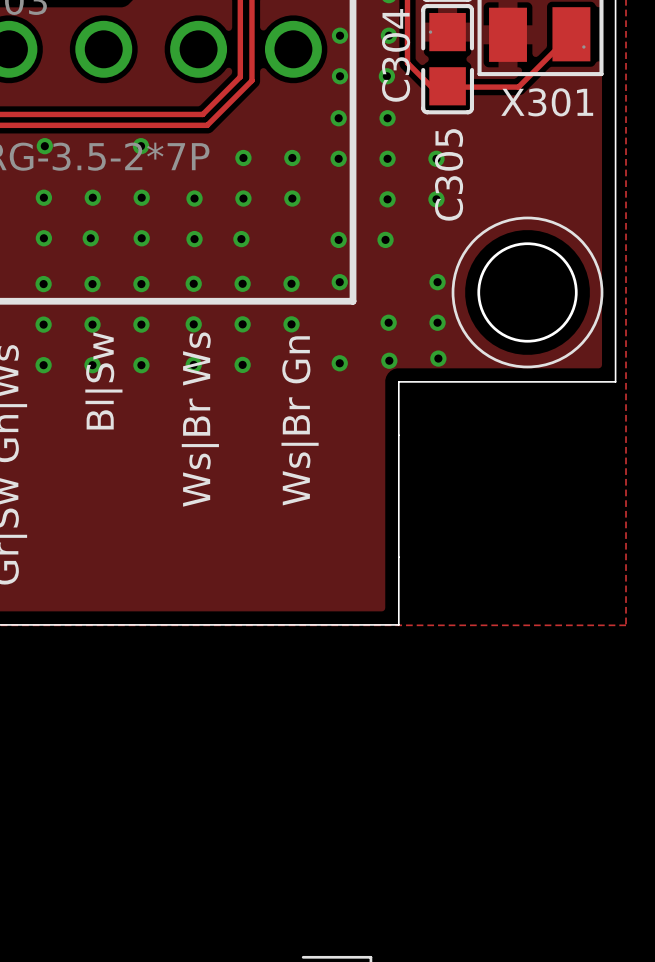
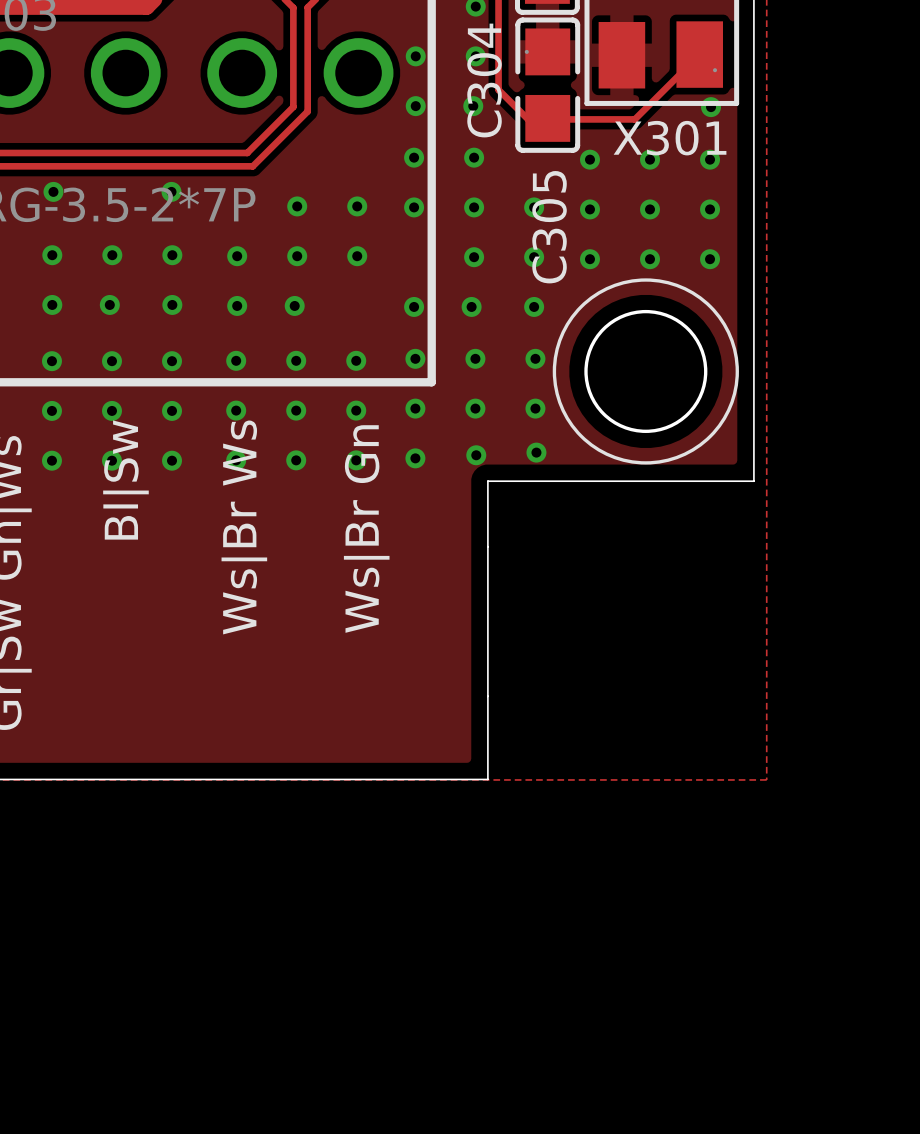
via: none -> (711, 107)
via: none -> (589, 159)
via: none -> (650, 159)
via: none -> (710, 159)
via: none -> (589, 209)
via: none -> (650, 209)
via: none -> (710, 209)
via: none -> (589, 259)
via: none -> (650, 259)
via: none -> (710, 259)
via: none -> (534, 306)
via: none -> (475, 358)
via: none -> (415, 408)
via: none -> (356, 460)

